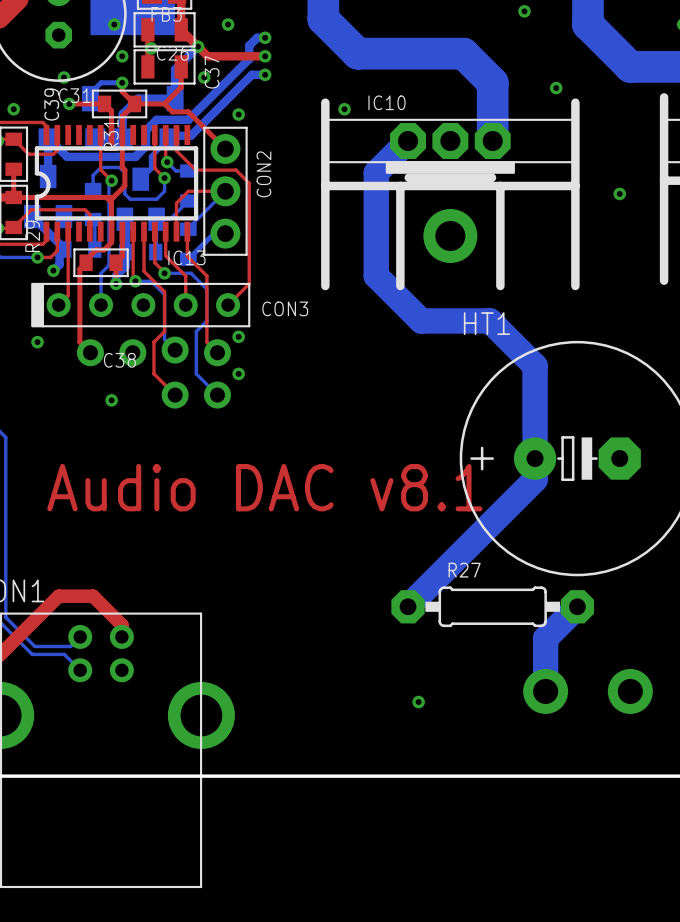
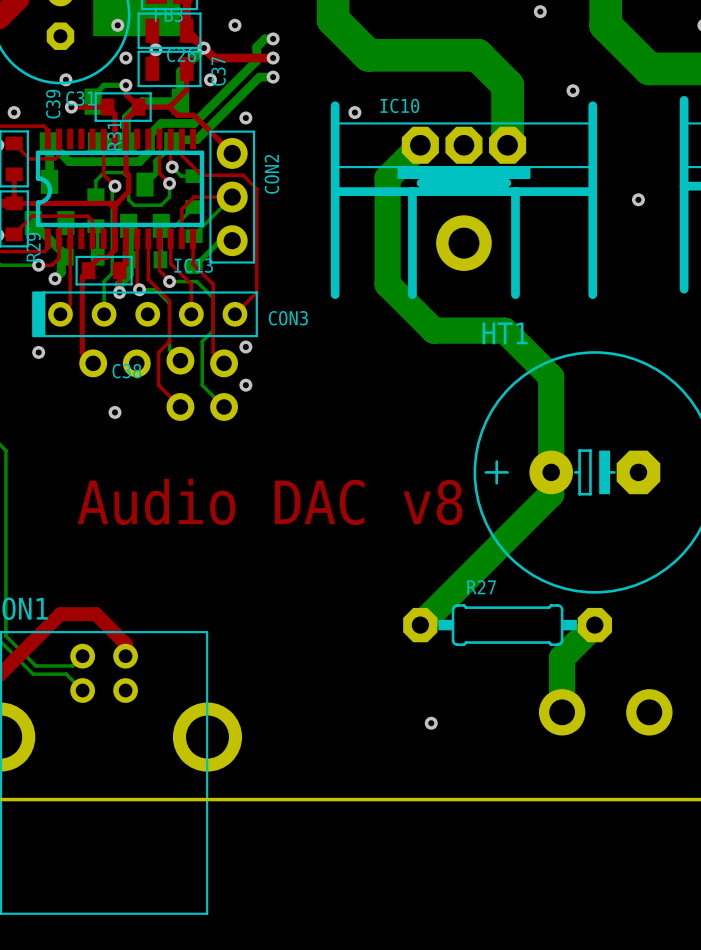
text: Audio DAC v8.1 (264, 487) -> Audio DAC v8 (270, 501)

